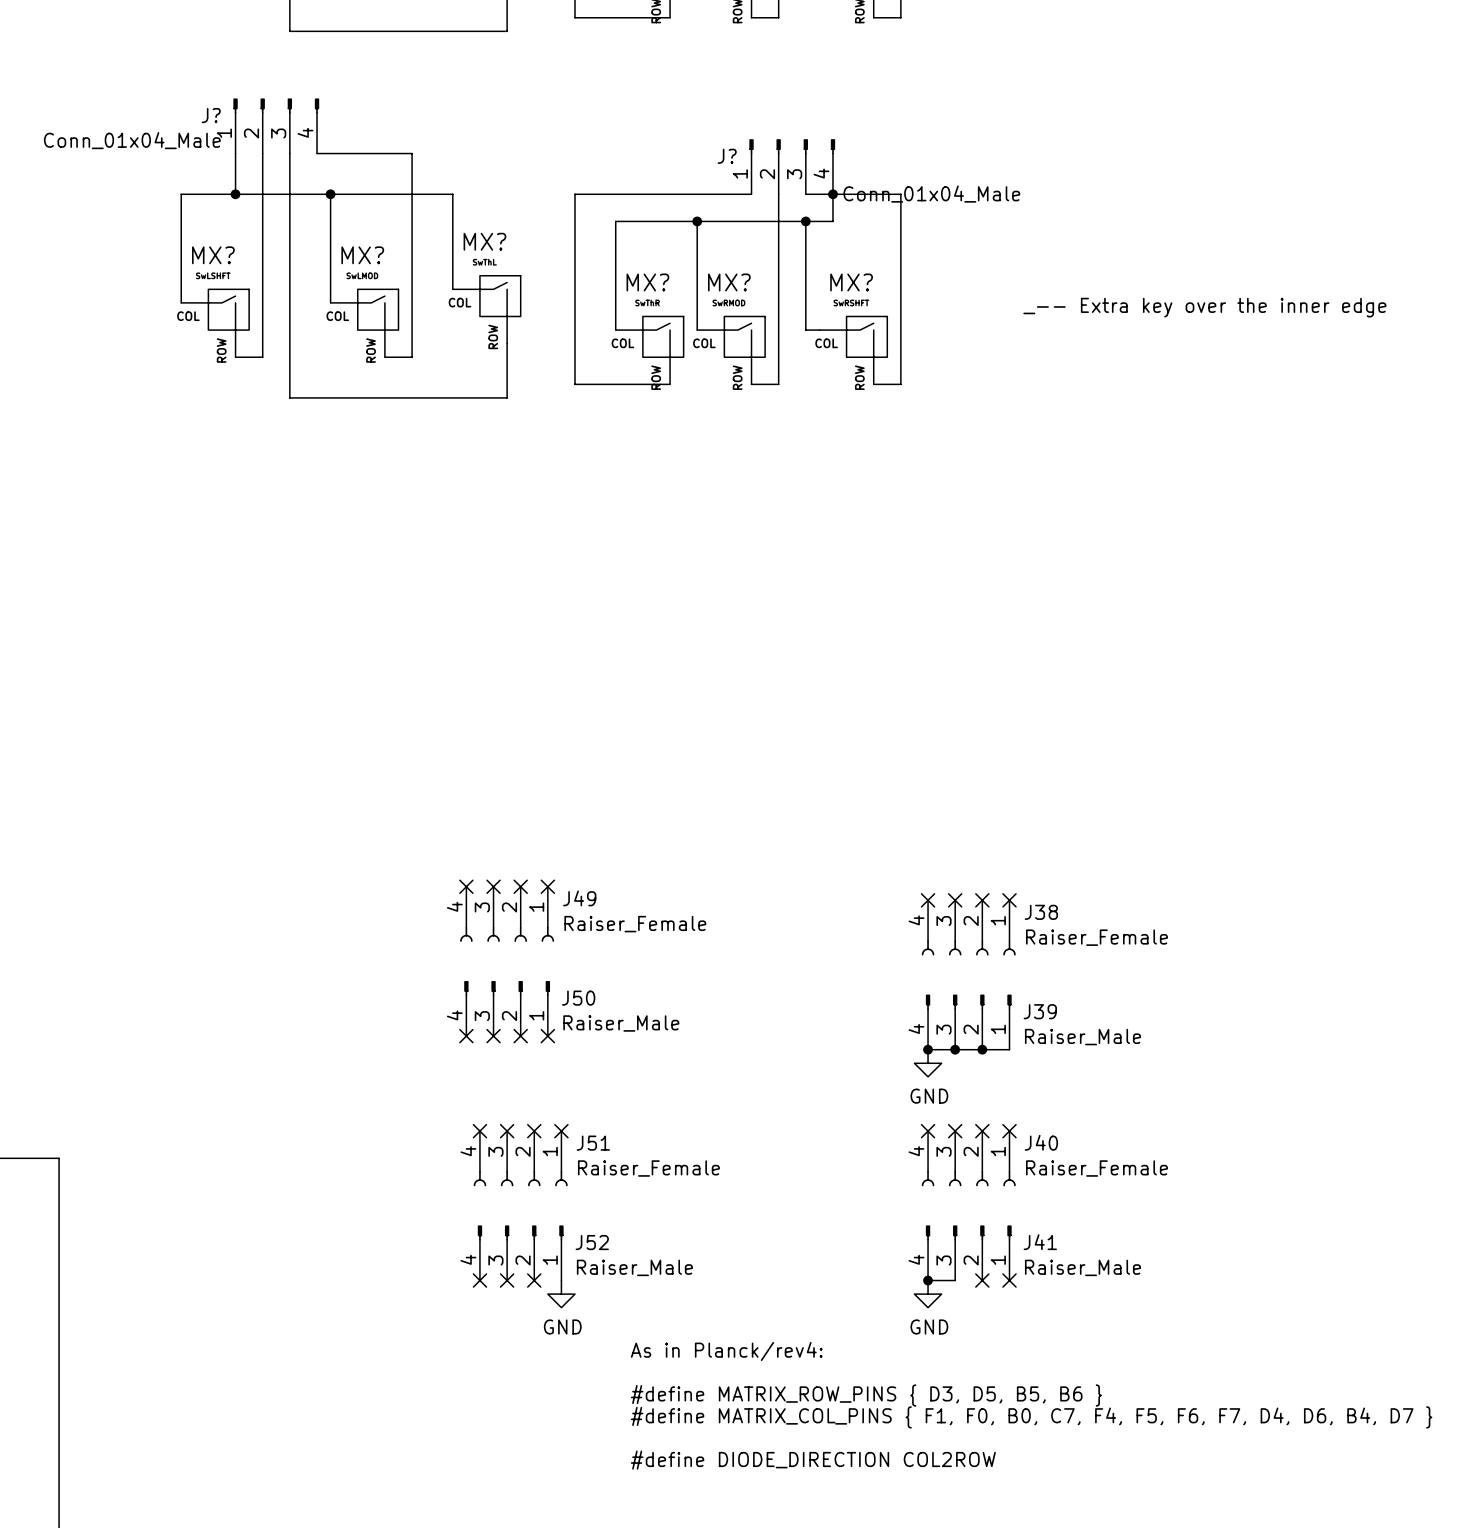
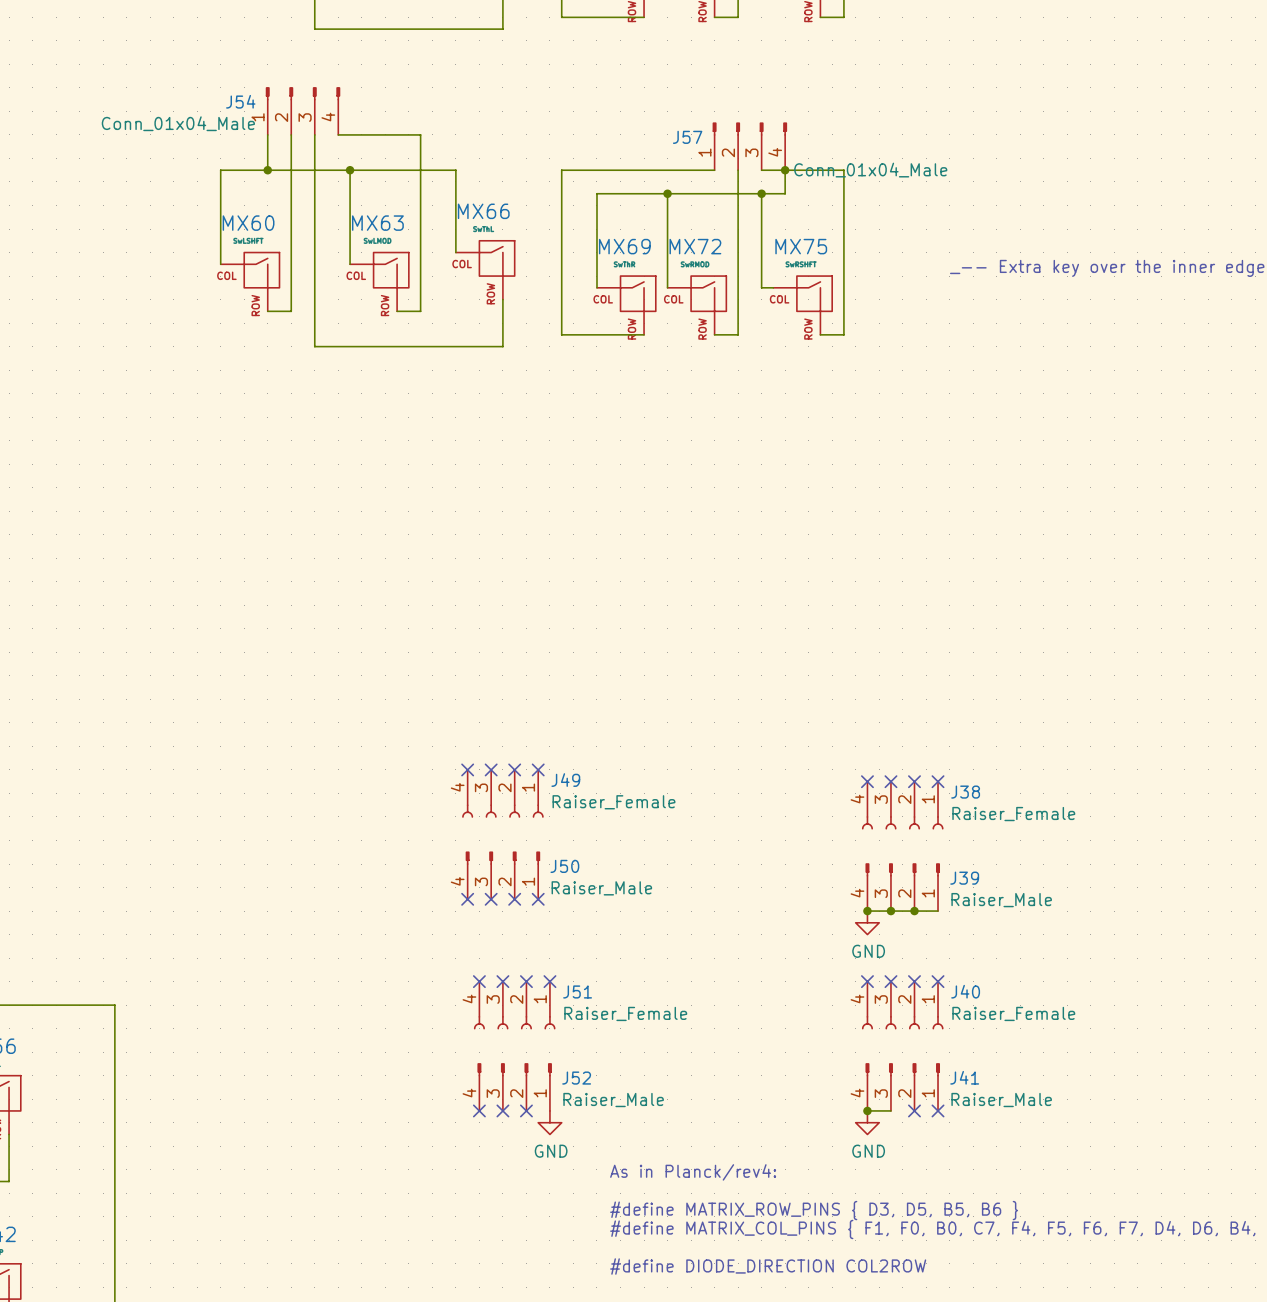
J? name: J? (211, 115) -> J54 (240, 101)
J? name: J? (727, 156) -> J57 (687, 137)
MX? name: MX? (484, 241) -> MX66 (483, 211)
MX? name: MX? (213, 255) -> MX60 (248, 223)
MX? name: MX? (362, 255) -> MX63 (377, 223)
MX? name: MX? (647, 282) -> MX69 (624, 246)
MX? name: MX? (729, 282) -> MX72 (695, 246)
MX? name: MX? (851, 282) -> MX75 (801, 246)

